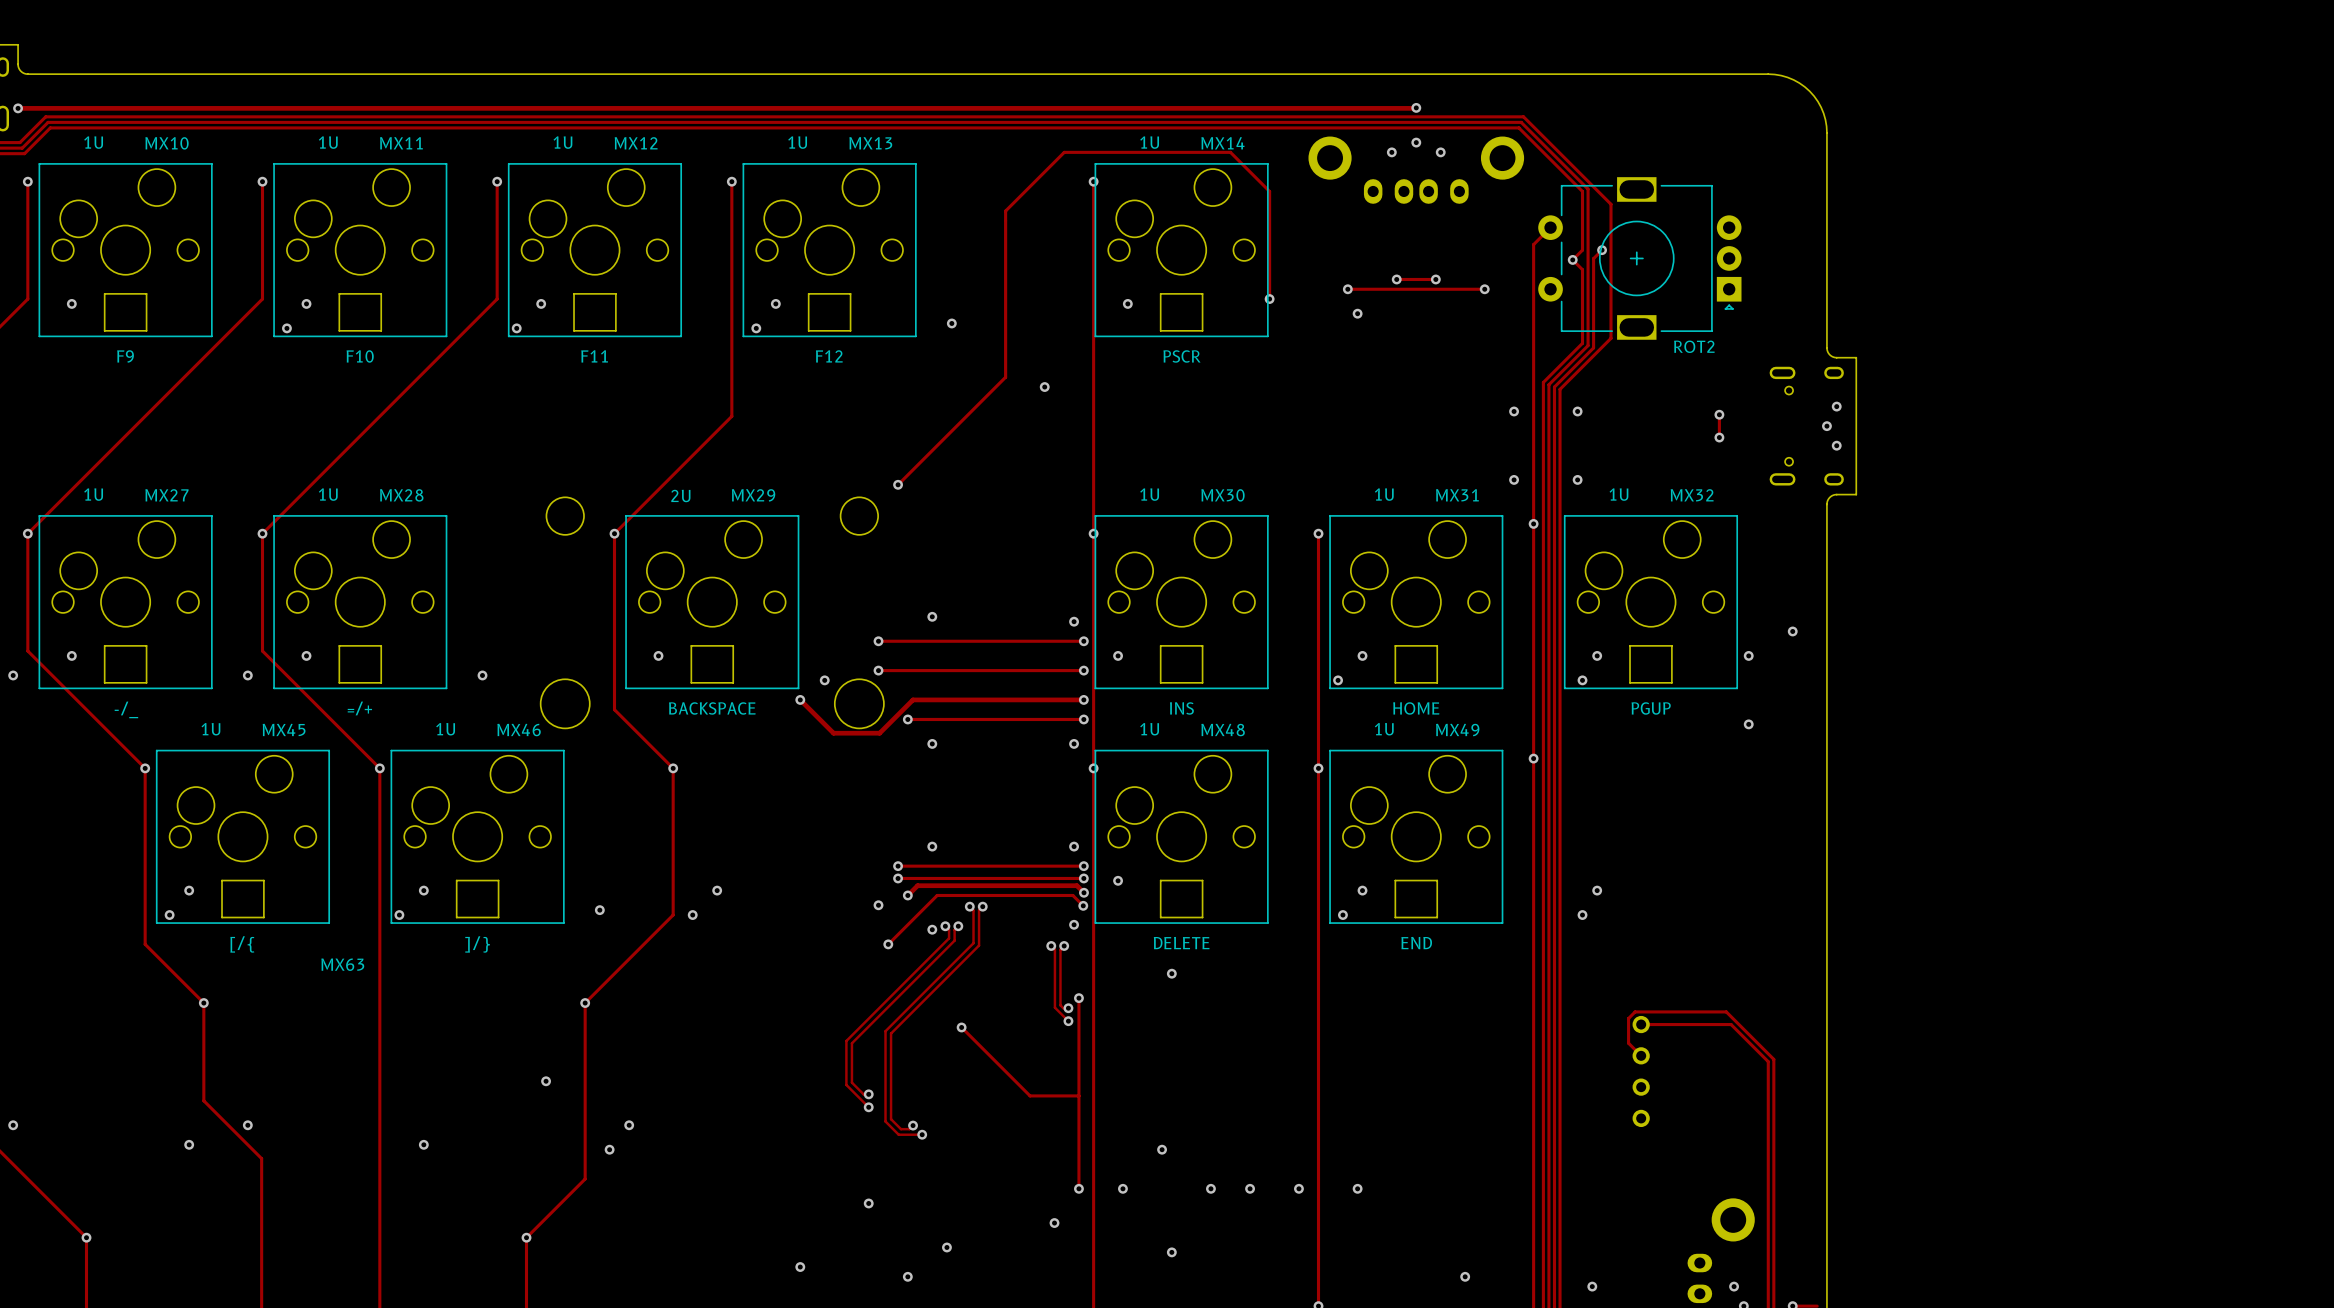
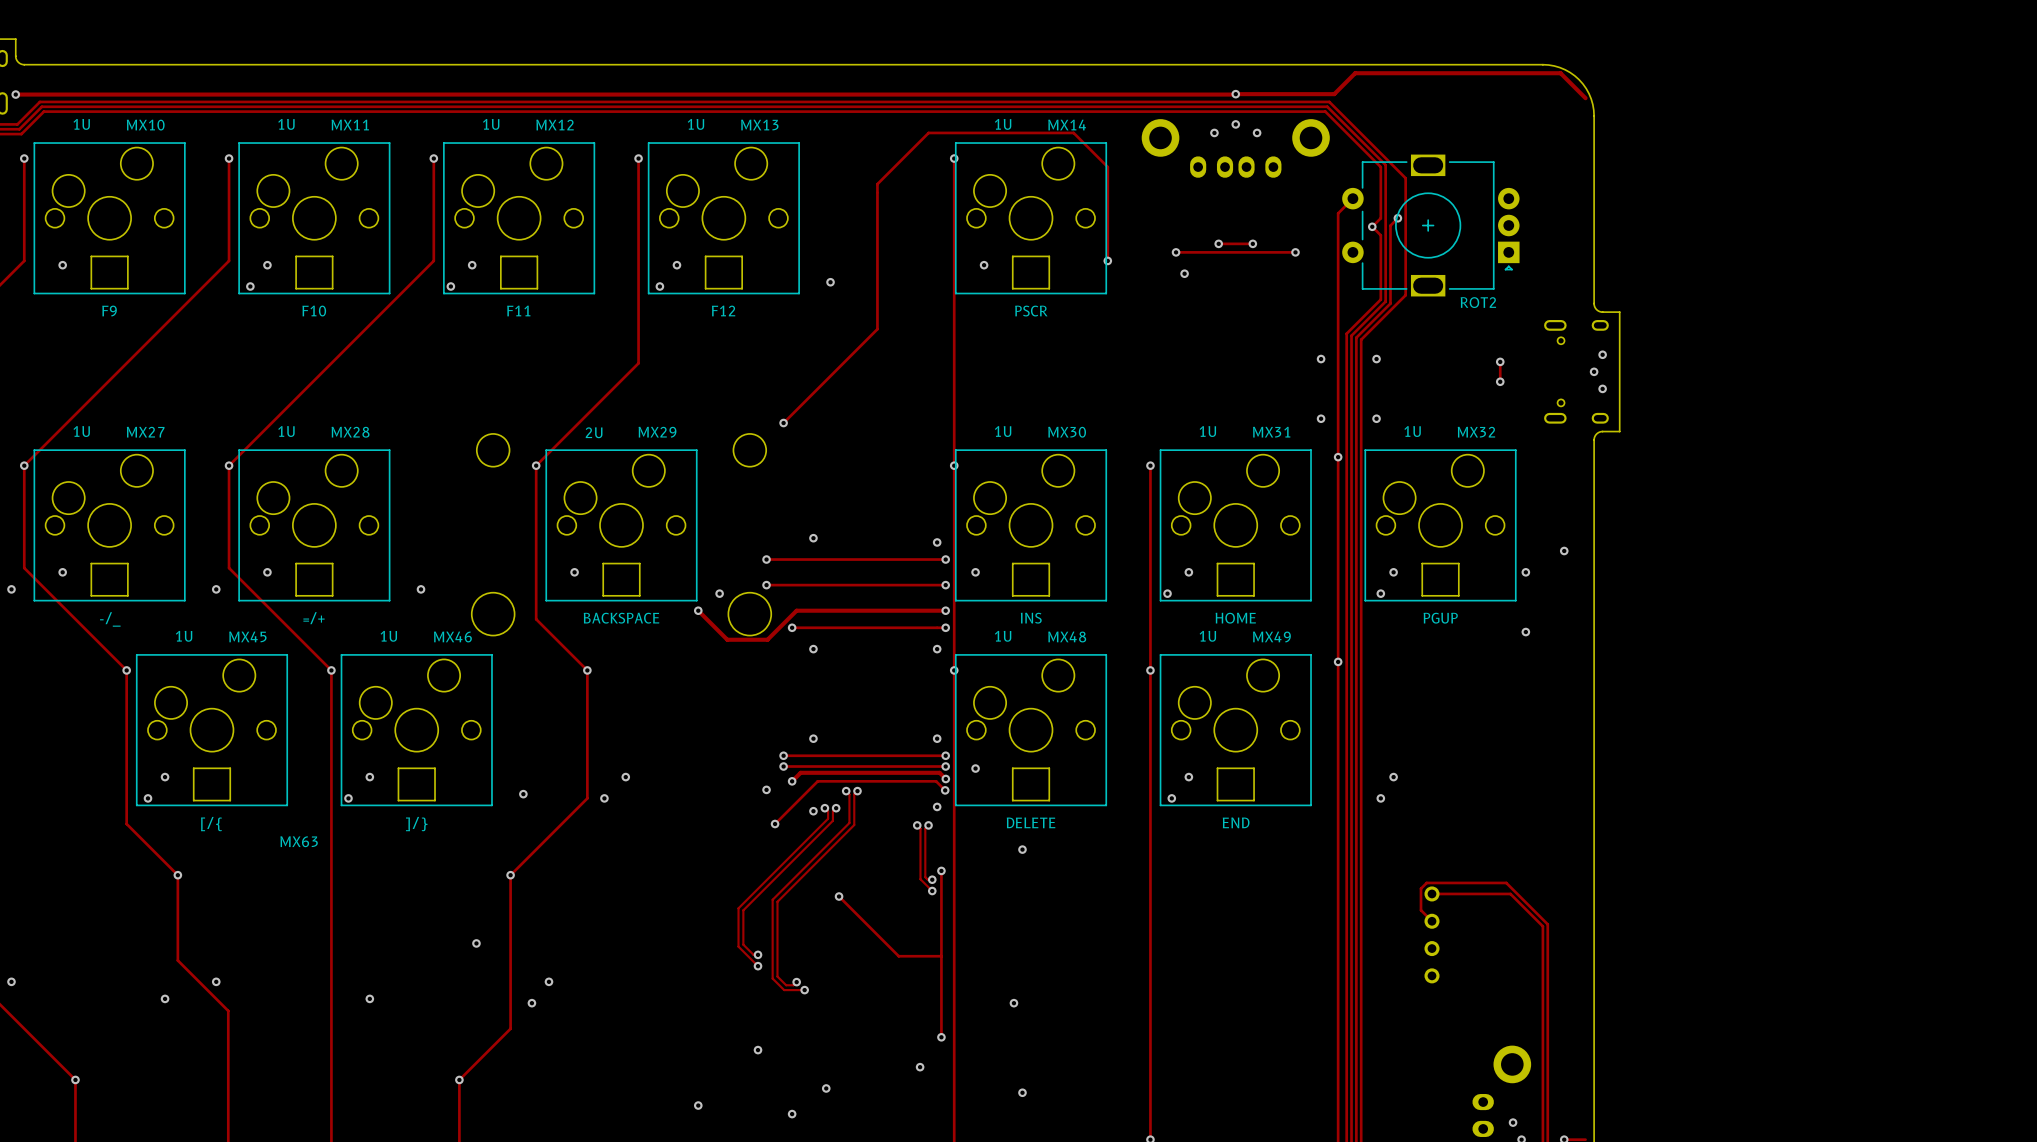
track: none -> (1235, 94) (1334, 94) (1355, 73) (1560, 73) (1585, 98)
via: (1044, 387) -> none
via: (1122, 1188) -> none
via: (1210, 1188) -> none
via: (1250, 1188) -> none
via: (1298, 1188) -> none
via: (1357, 1188) -> none
via: (1465, 1276) -> none
via: (1592, 1286) -> none

